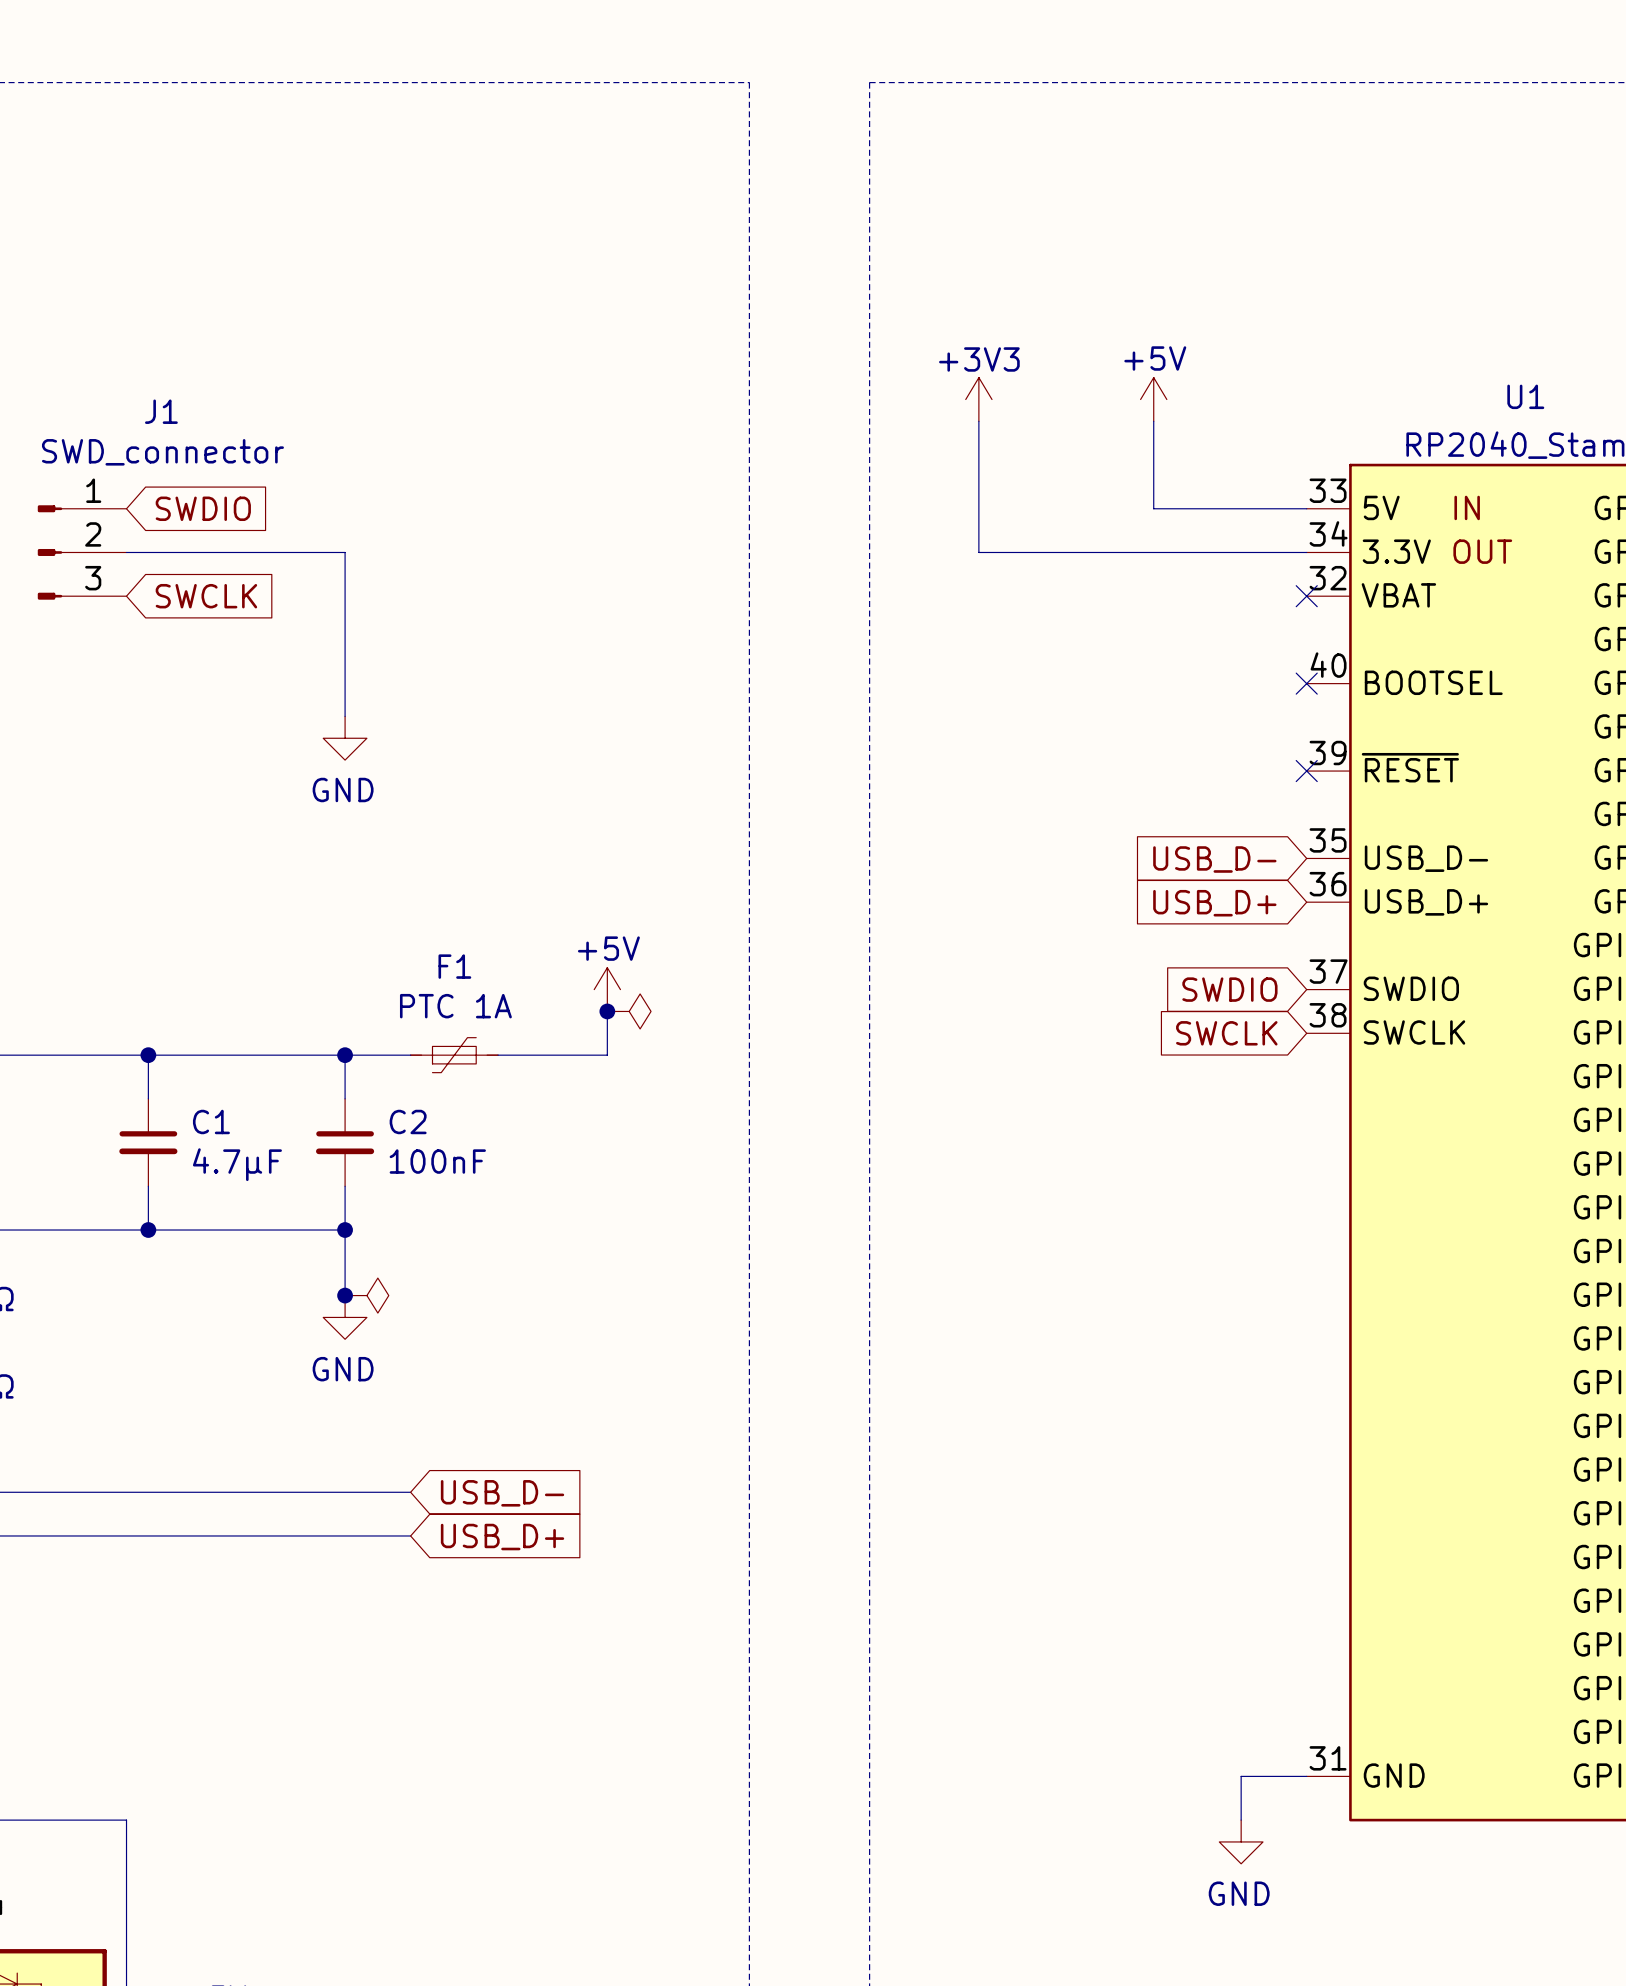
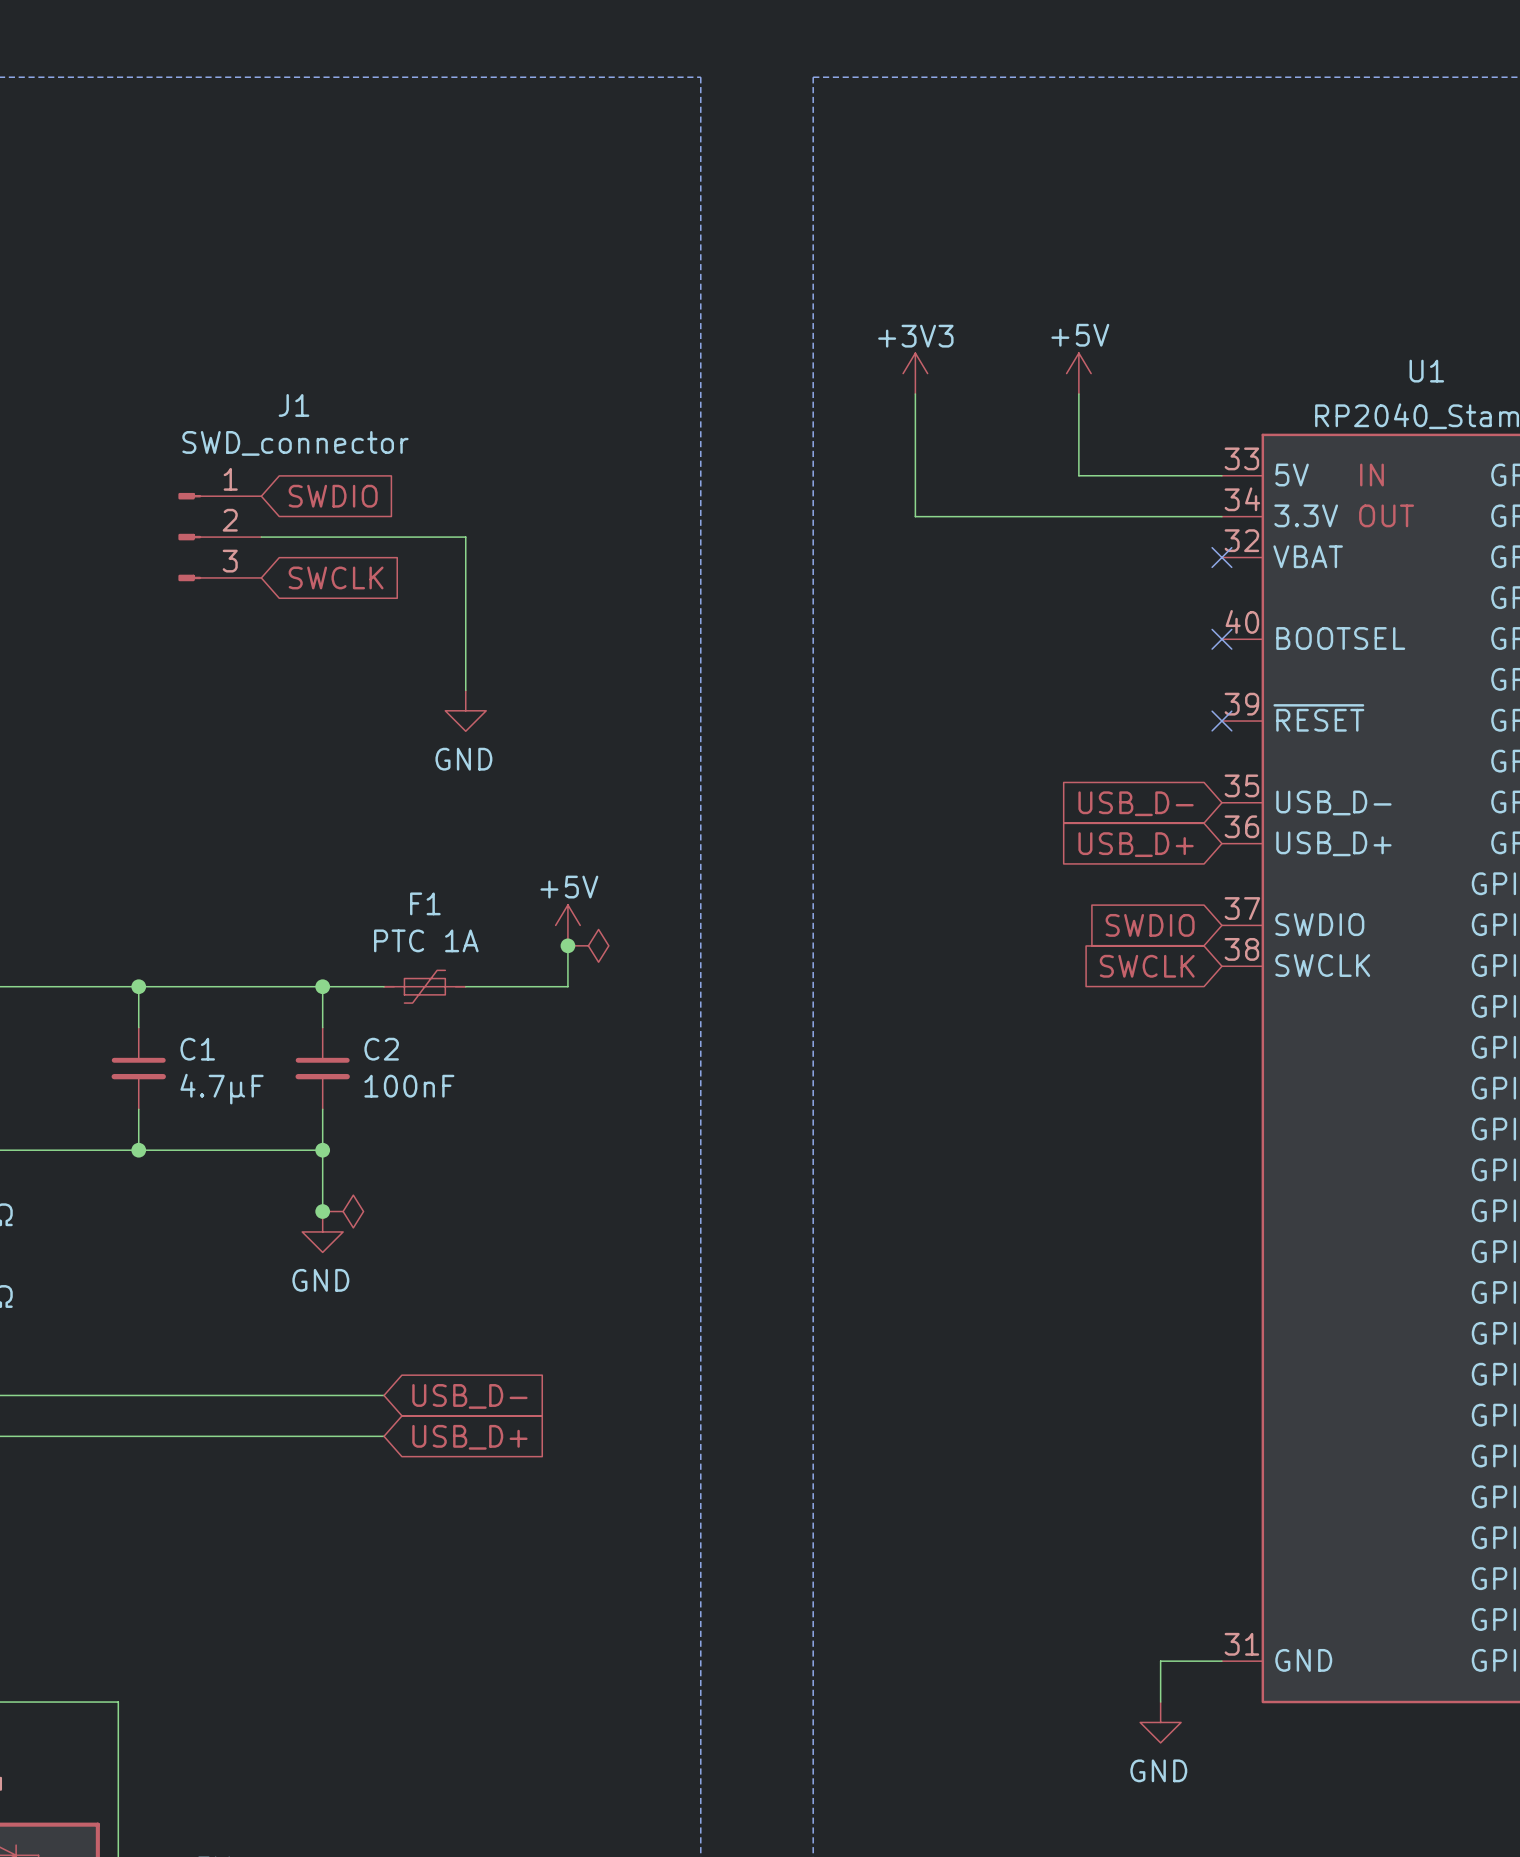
global label position: SWDIO (203, 508) -> SWDIO (333, 496)
J1 position: (82, 552) -> (219, 537)
wire: (126, 552) (345, 552) (345, 716) -> (261, 537) (465, 537) (465, 690)
global label position: SWCLK (206, 596) -> SWCLK (336, 577)
power symbol position: GND (345, 738) -> GND (465, 710)

